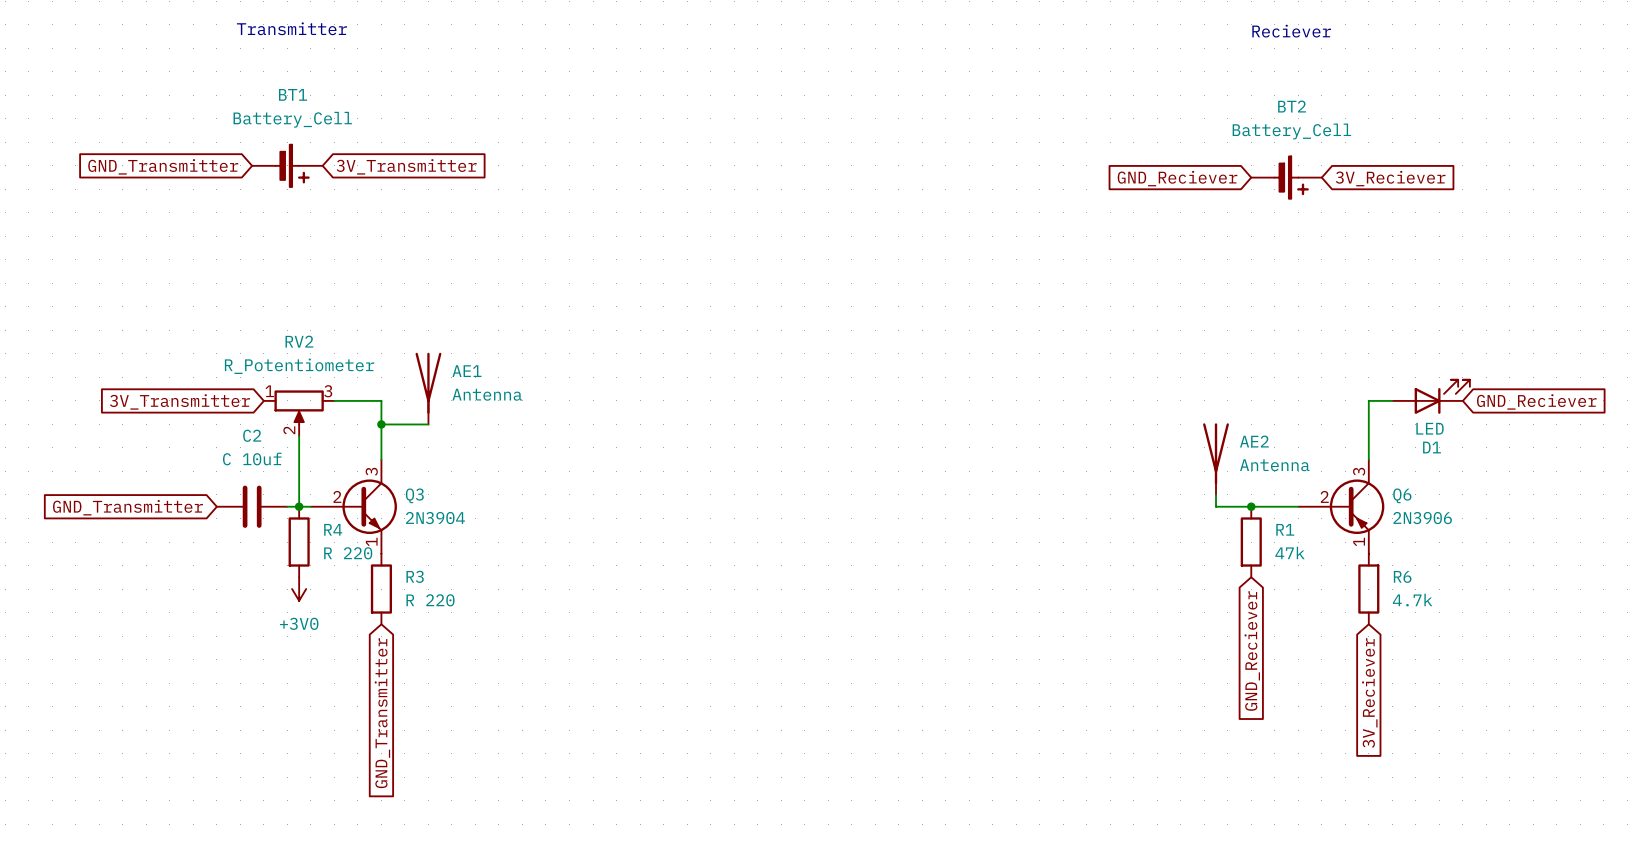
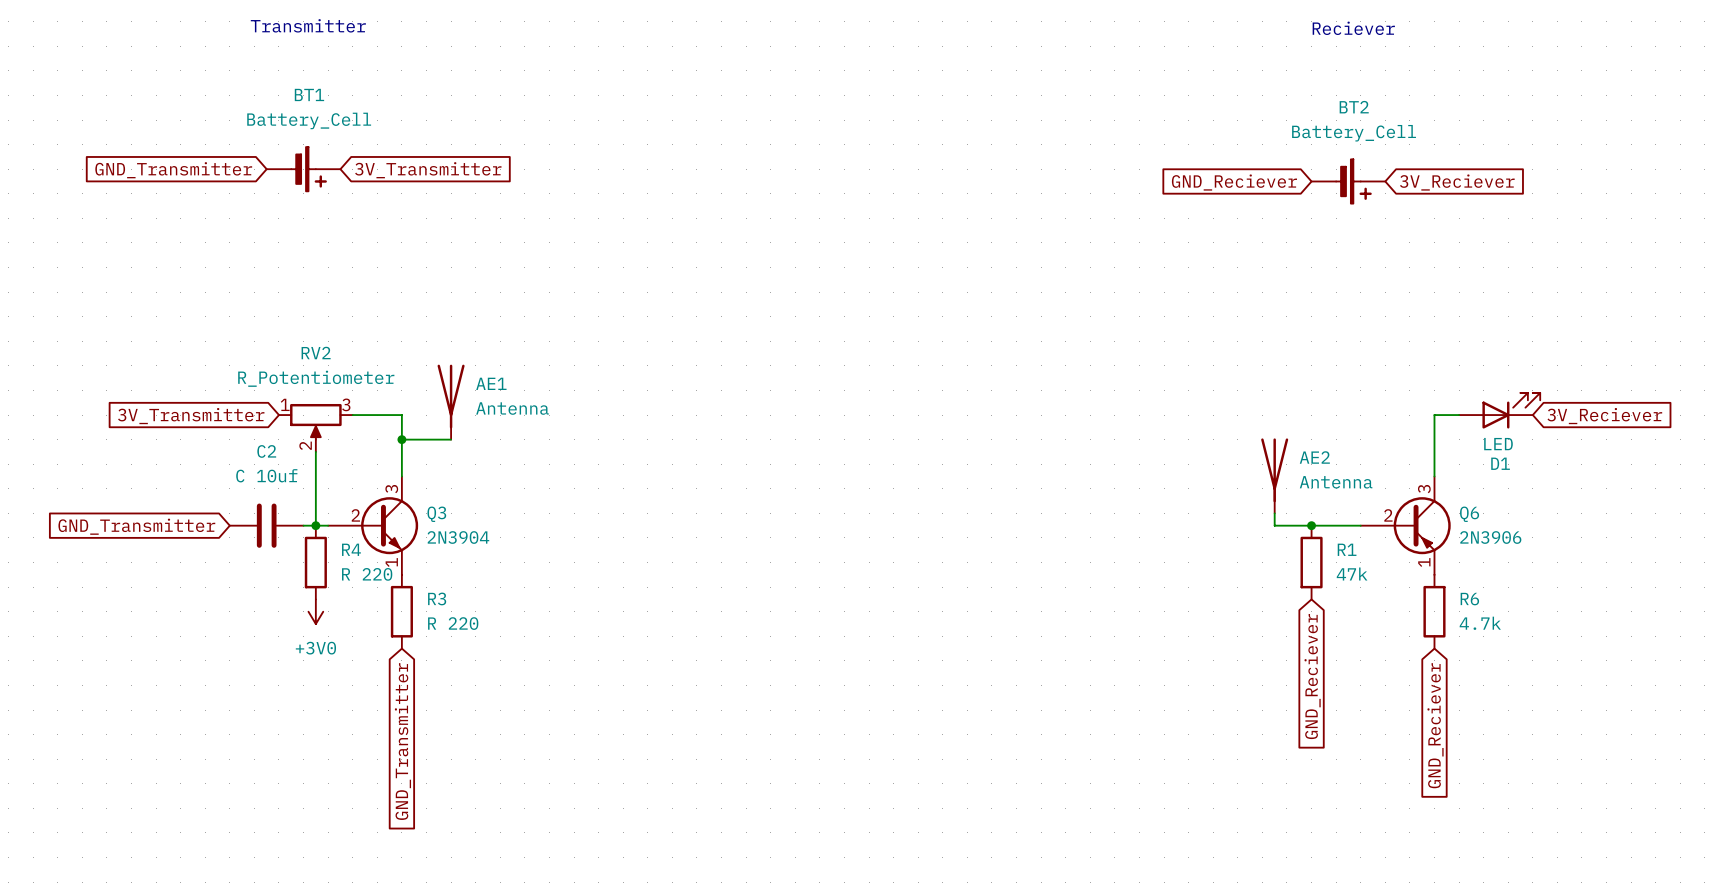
global label: GND_Reciever (1536, 401) -> 3V_Reciever (1604, 416)
global label: 3V_Reciever (1369, 693) -> GND_Reciever (1435, 725)

